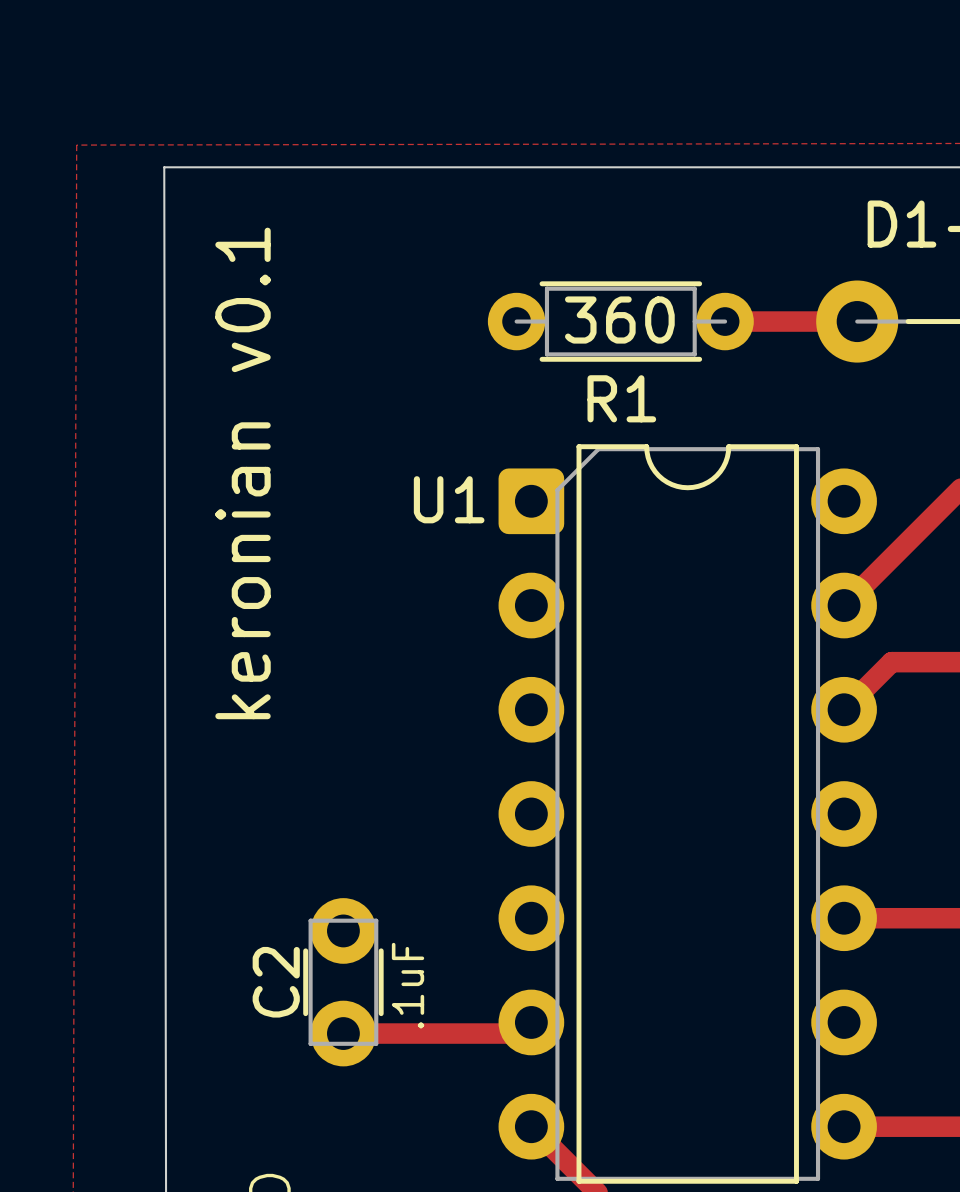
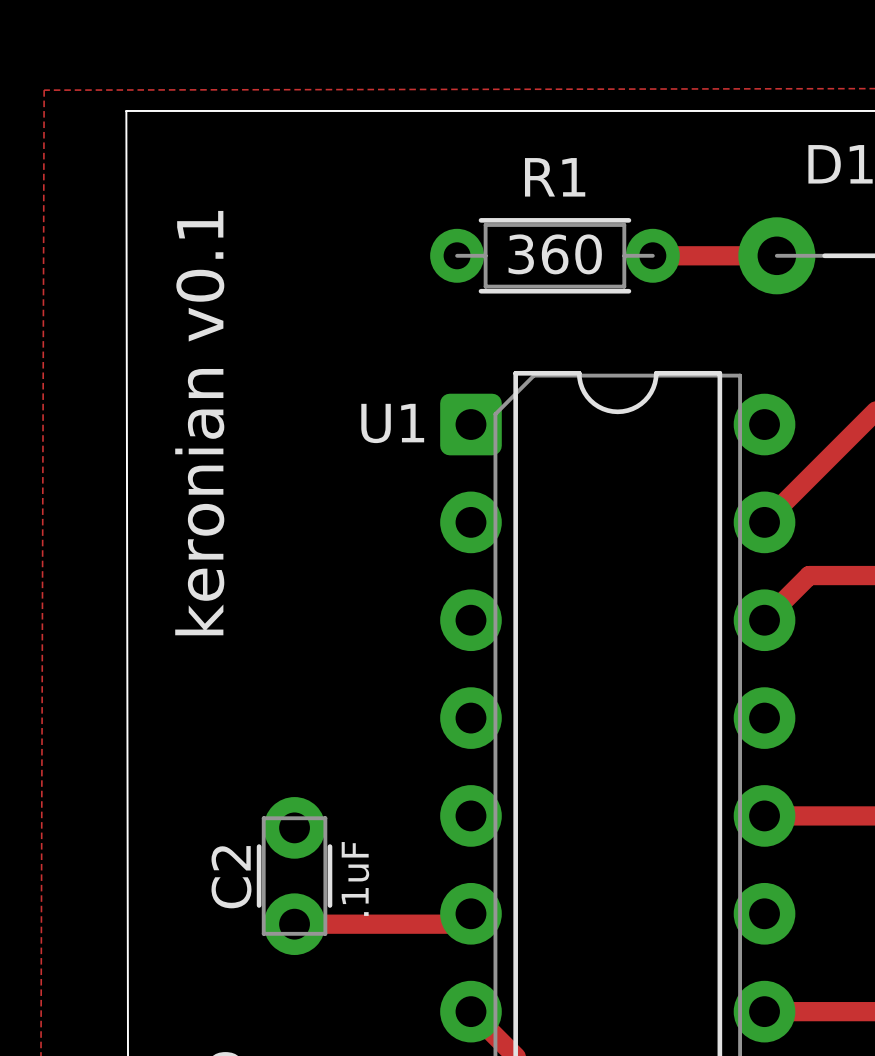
R1 name position: R1 (621, 398) -> R1 (555, 177)

